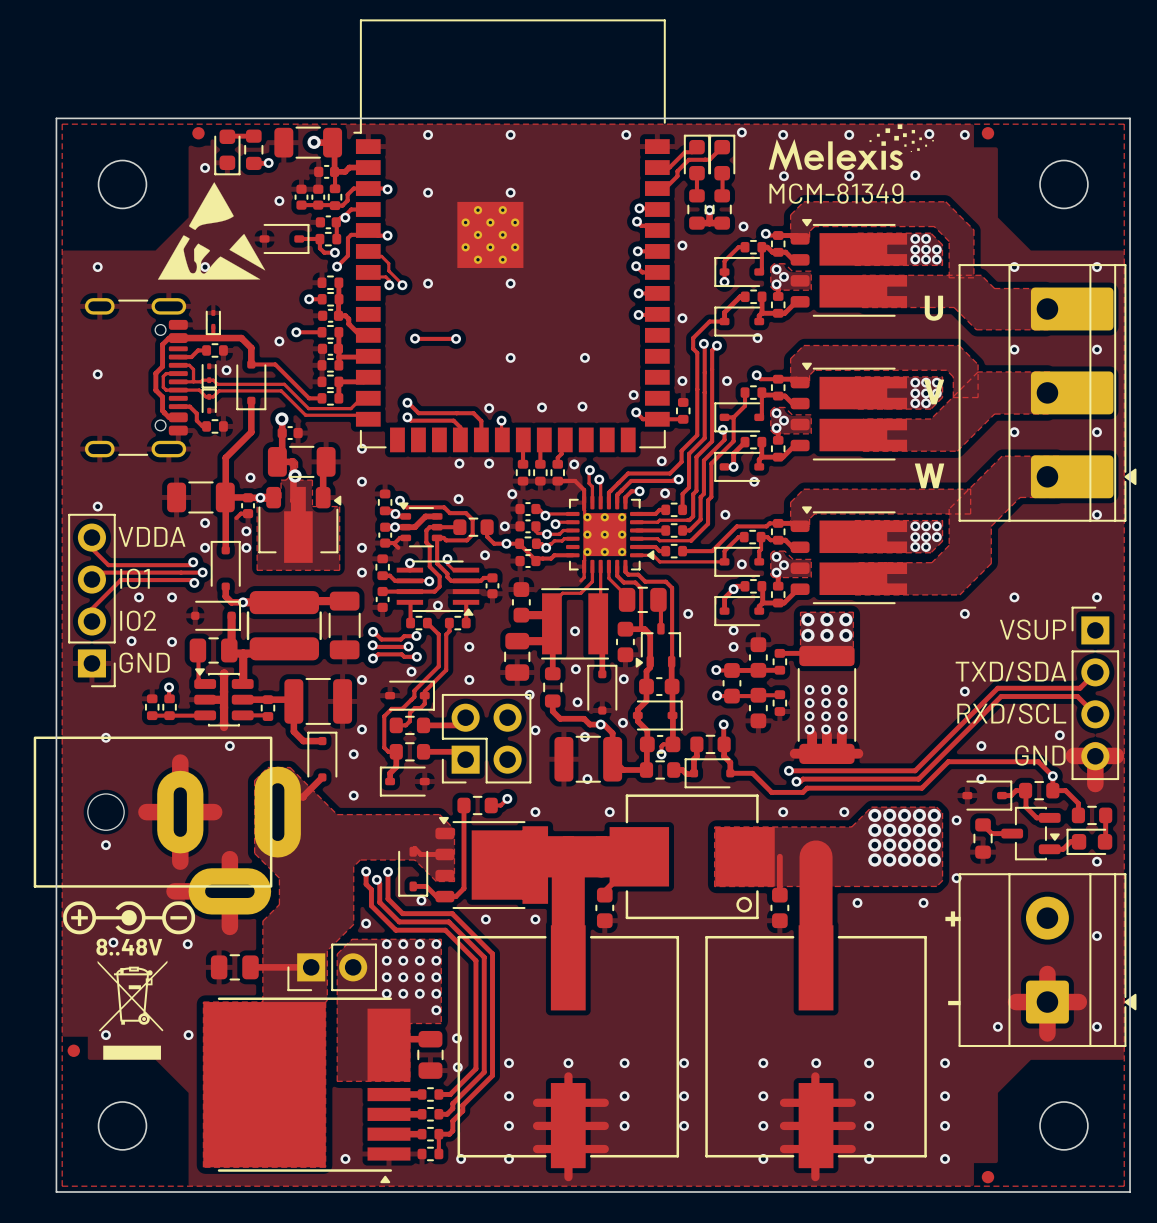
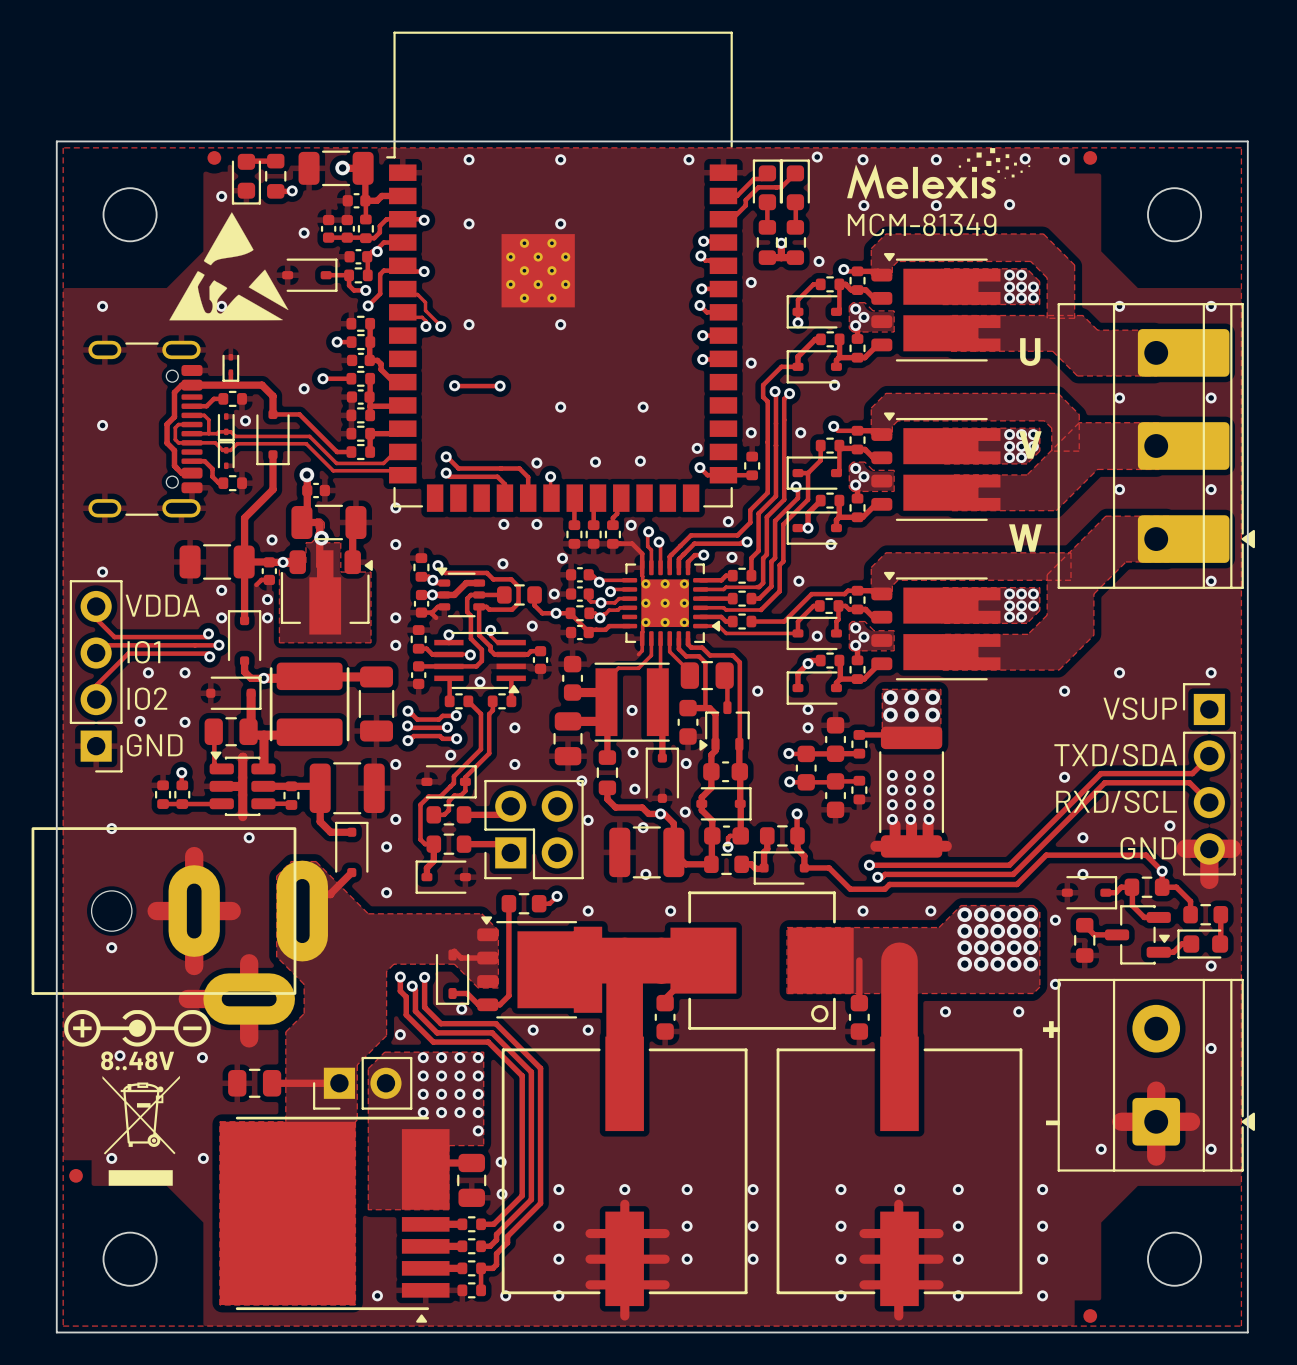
part footprint: [246, 591, 322, 661] -> [269, 662, 350, 746]

